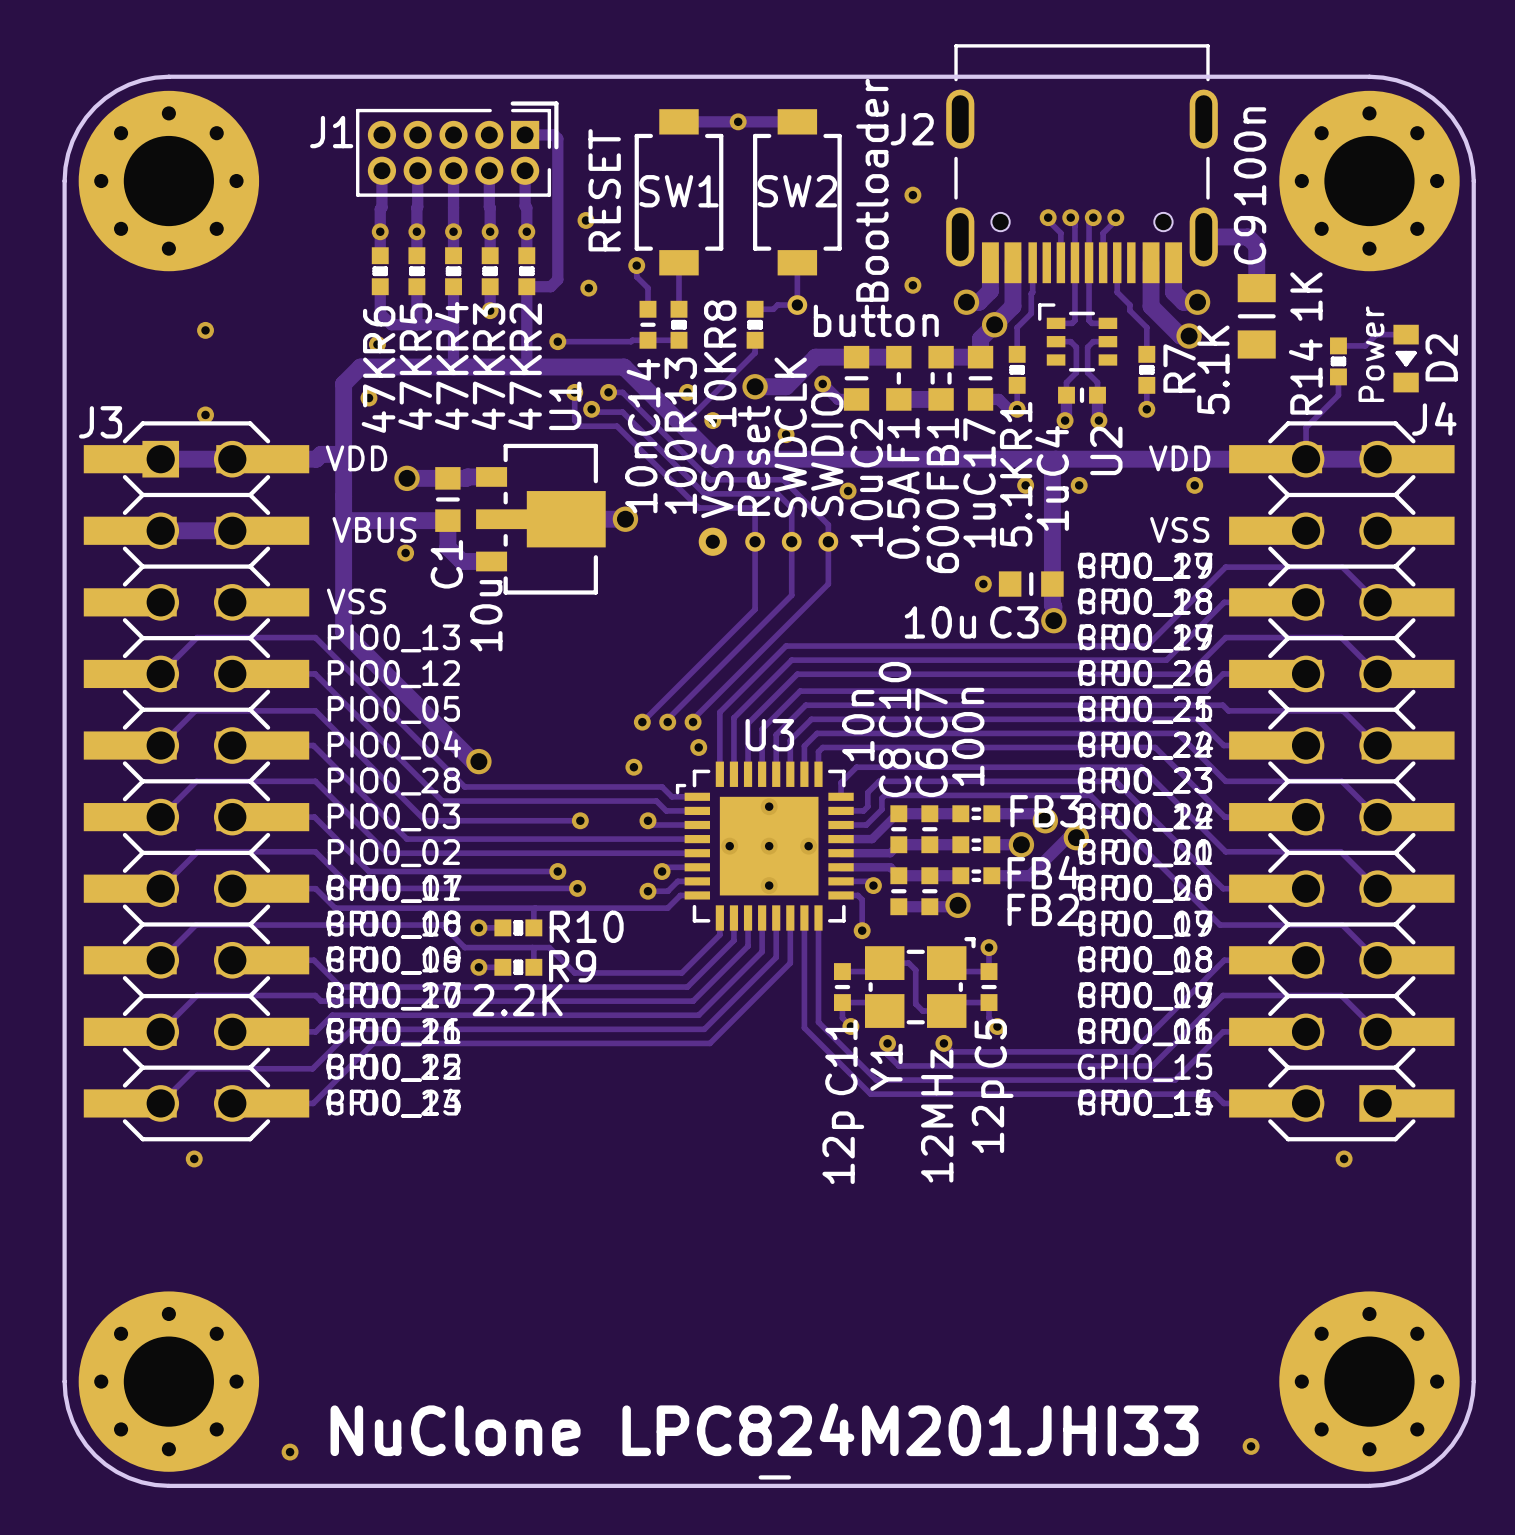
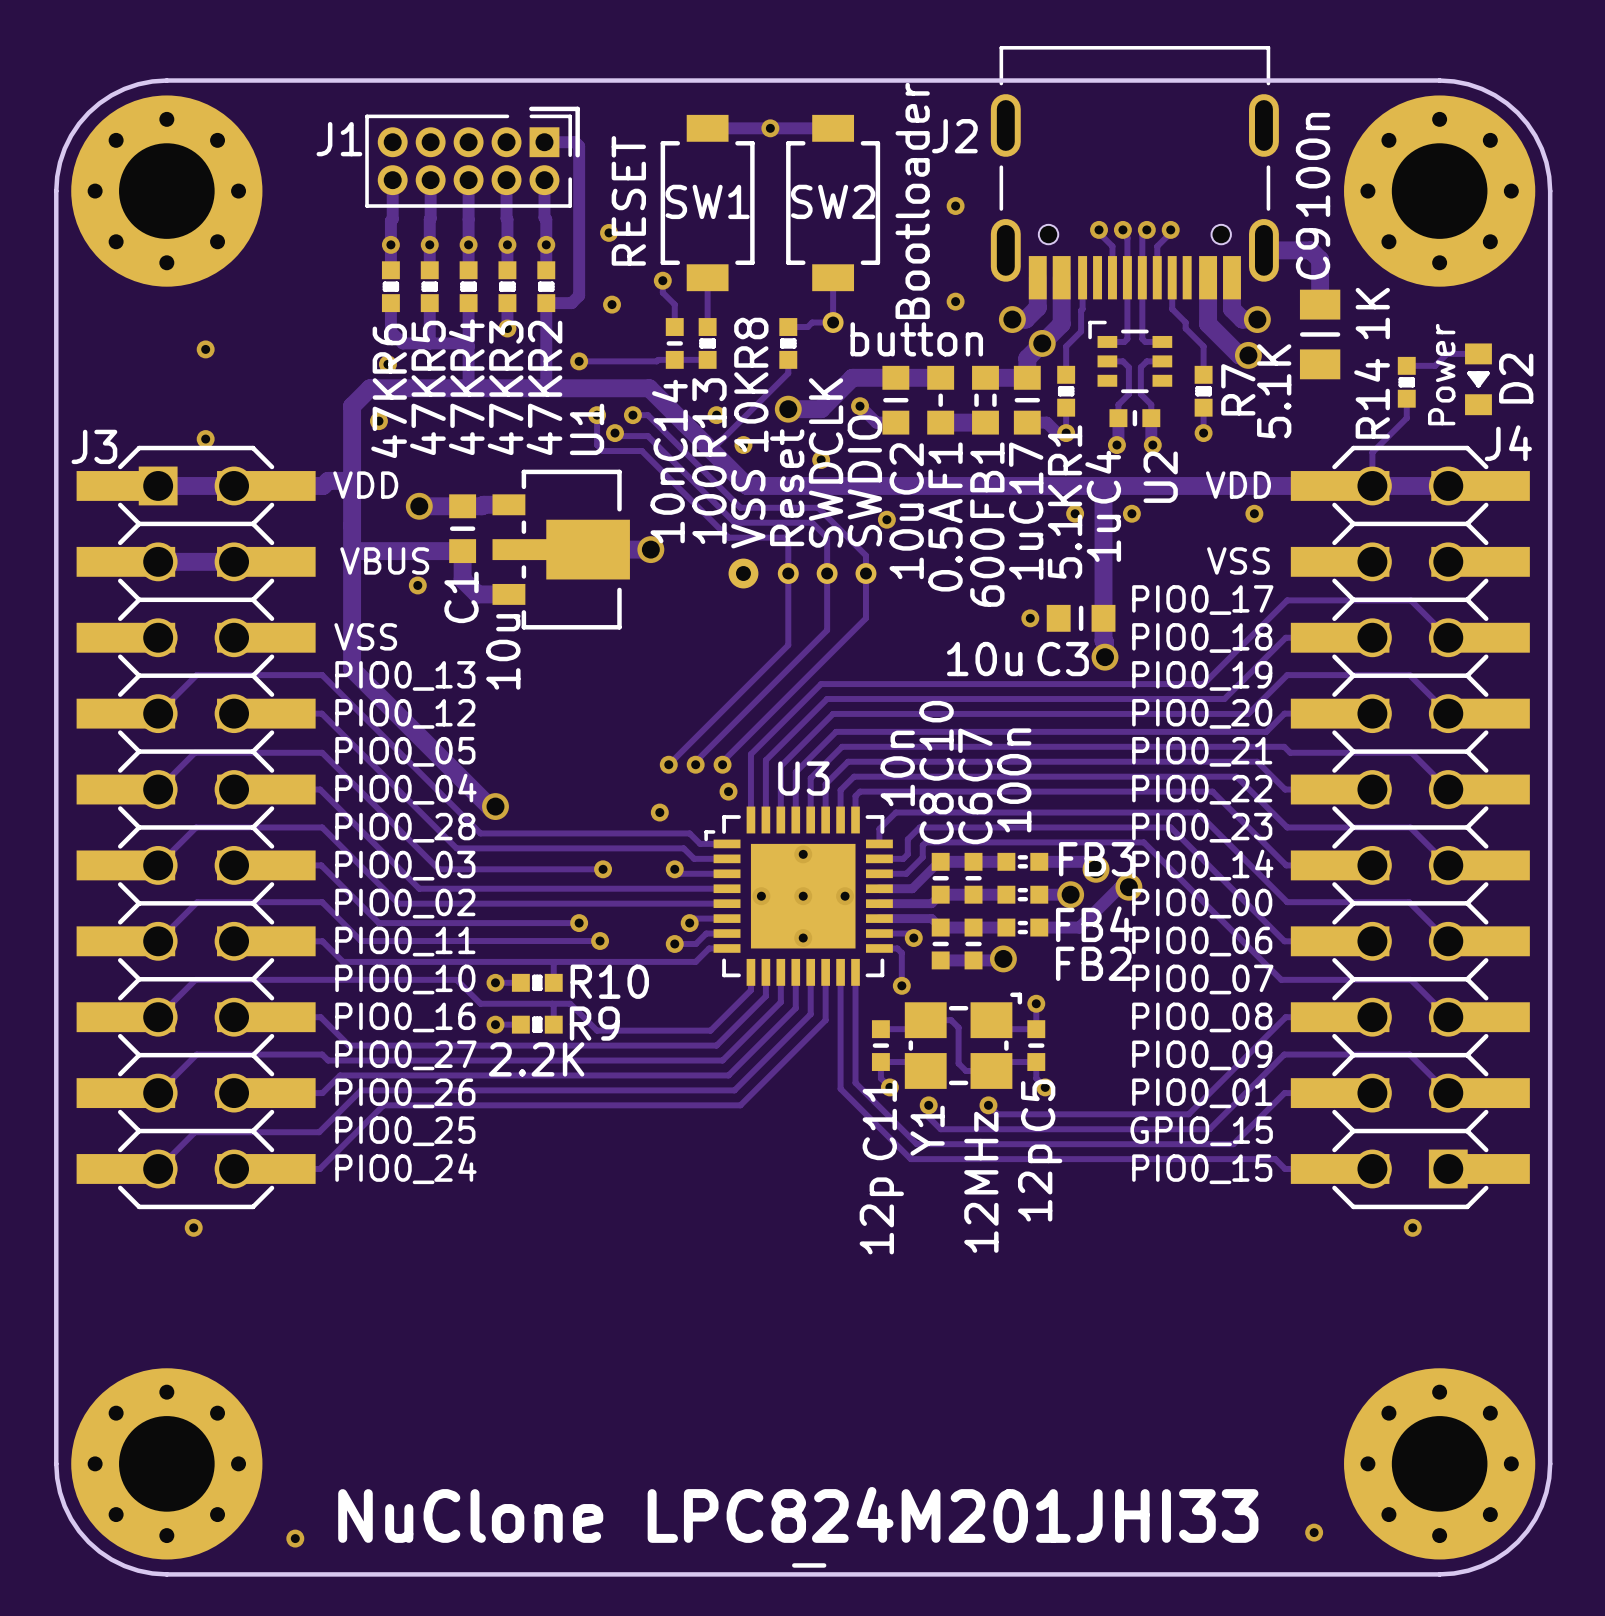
J3 footprint: [83, 421, 310, 1142] -> [76, 445, 316, 1210]
J4 footprint: [1229, 421, 1455, 1142] -> [1290, 445, 1530, 1210]

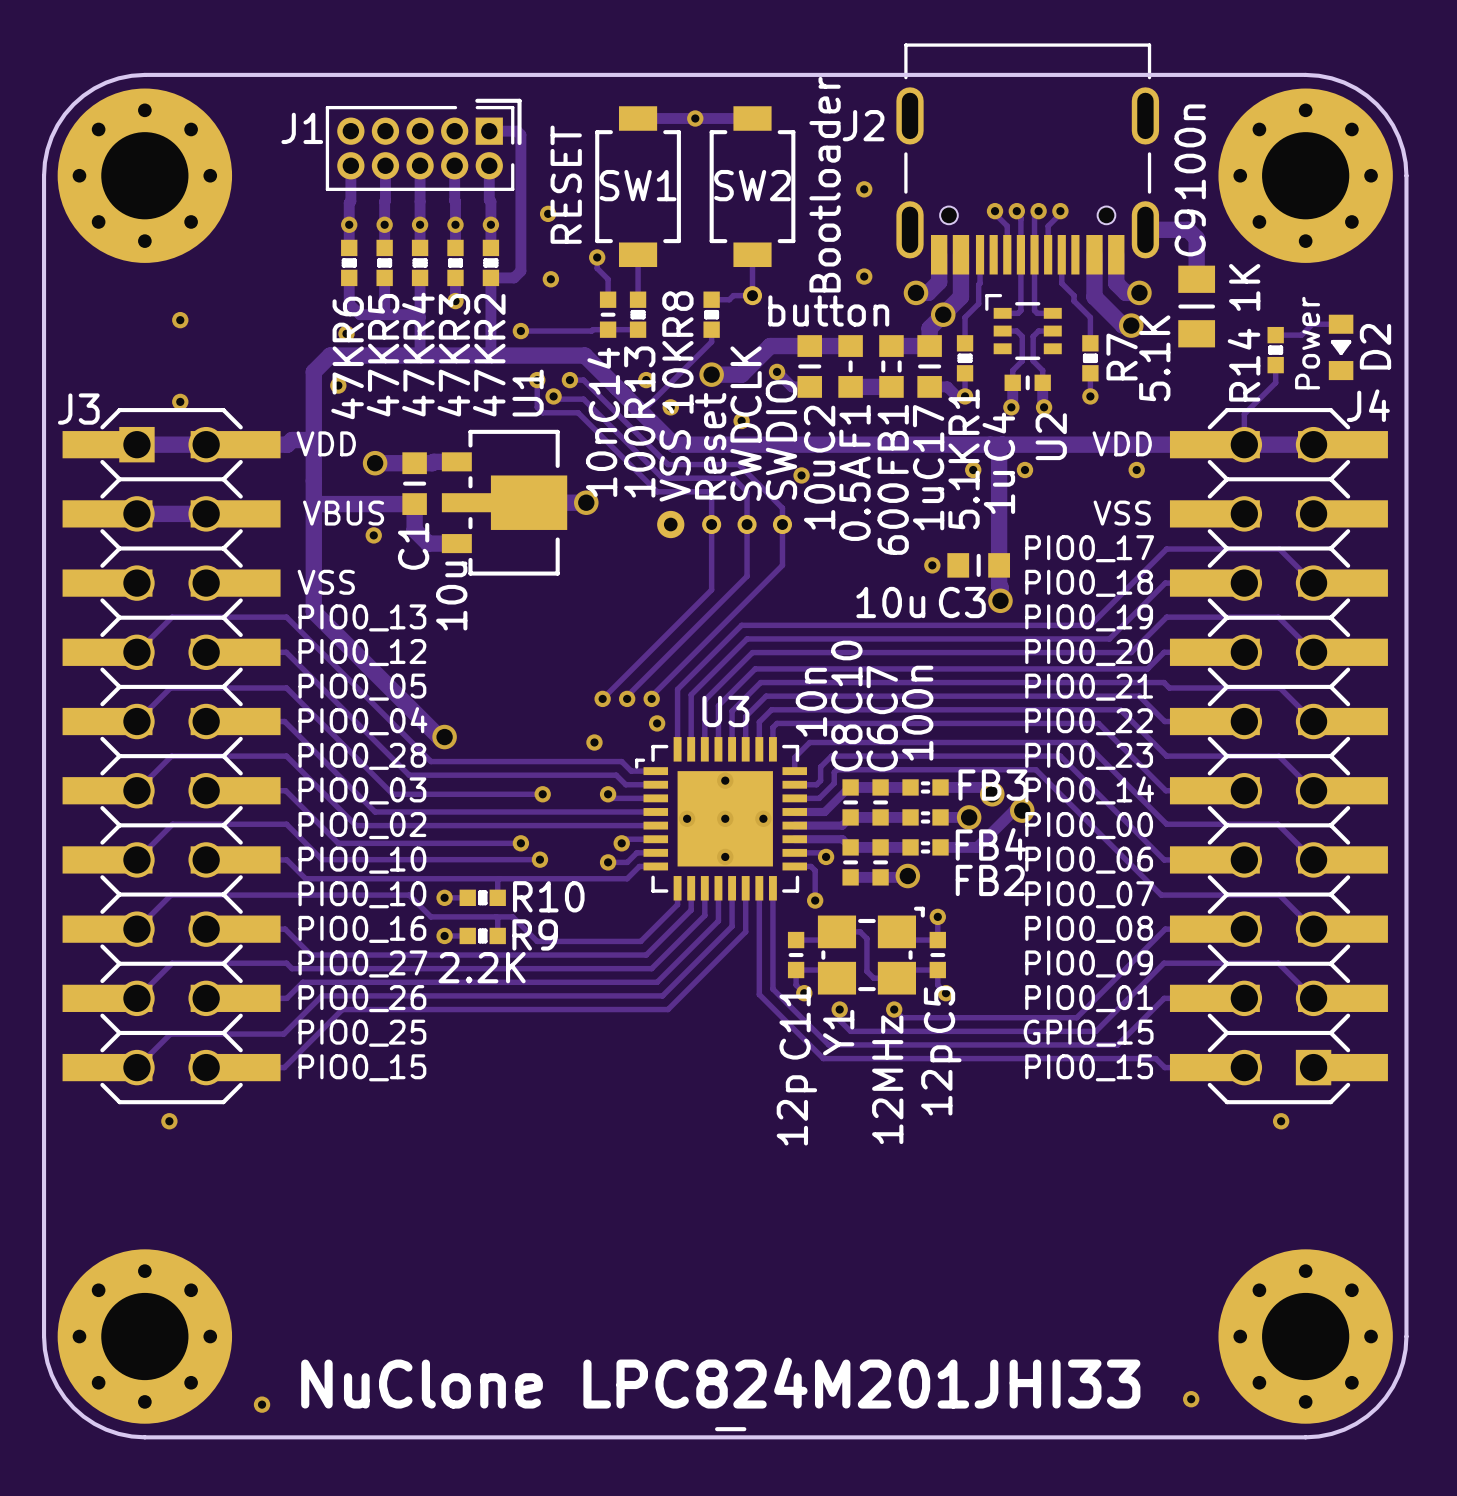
J3 text: PIO0_11 (405, 941) -> PIO0_10 (362, 860)
J3 text: PIO0_24 (405, 1168) -> PIO0_15 (362, 1067)

